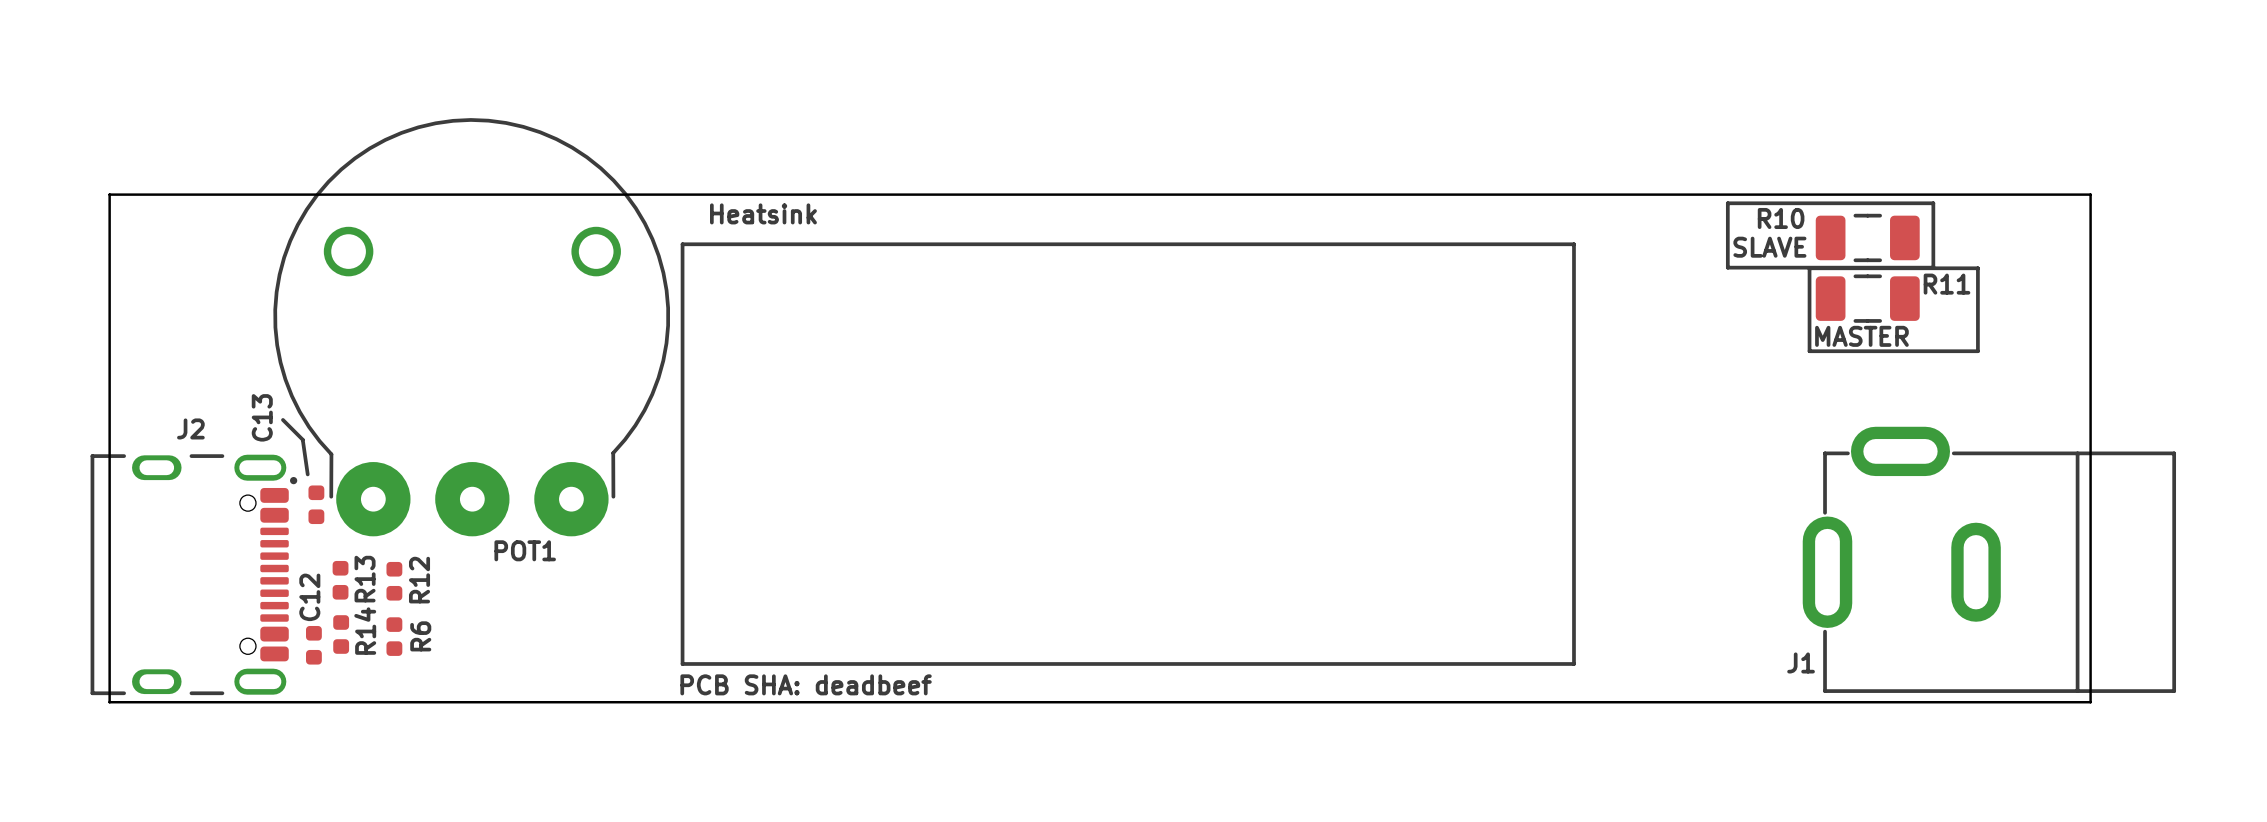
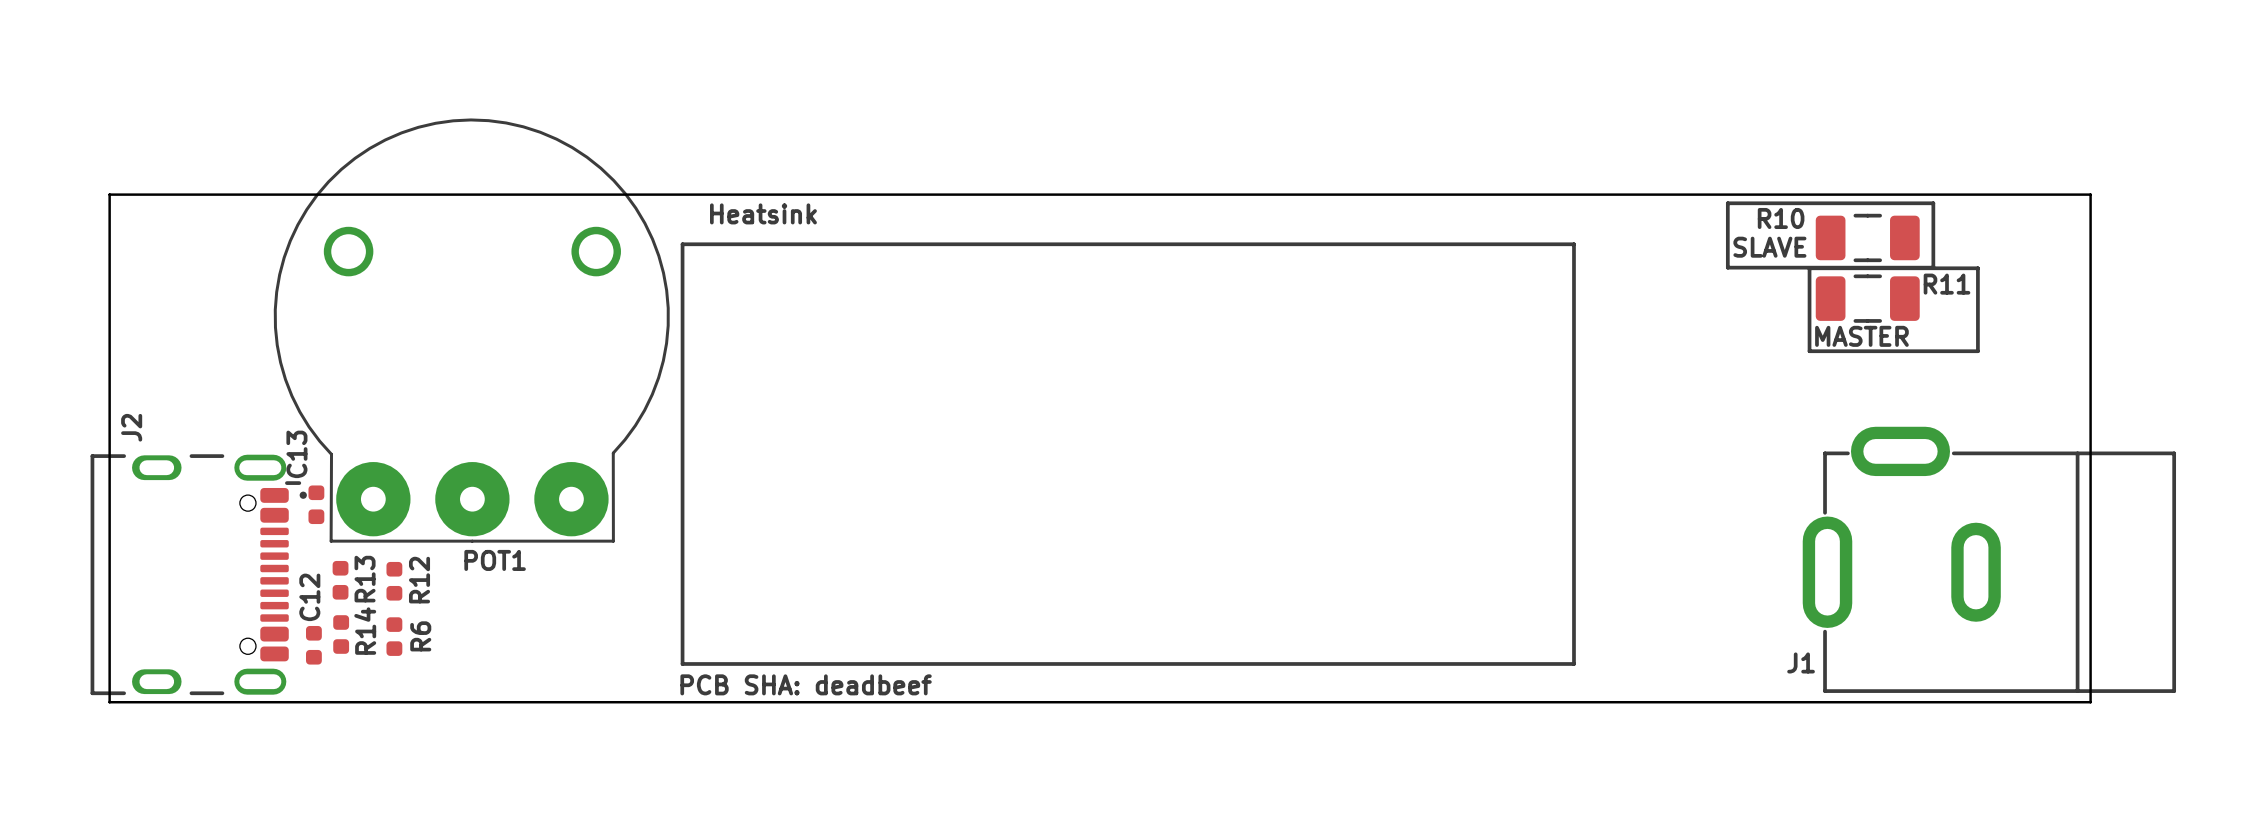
POT1 footprint: [273, 118, 671, 537] -> [273, 118, 670, 543]
C13 name position: C13 (262, 417) -> C13 (296, 454)
line: (282, 419) (302, 439) (307, 474) -> none
J2 name rotation: 0° (190, 428) -> 90° counterclockwise (131, 427)
J2 name position: J2 (190, 428) -> J2 (131, 427)
J2 footprint: [90, 454, 298, 696] -> [90, 454, 307, 696]

